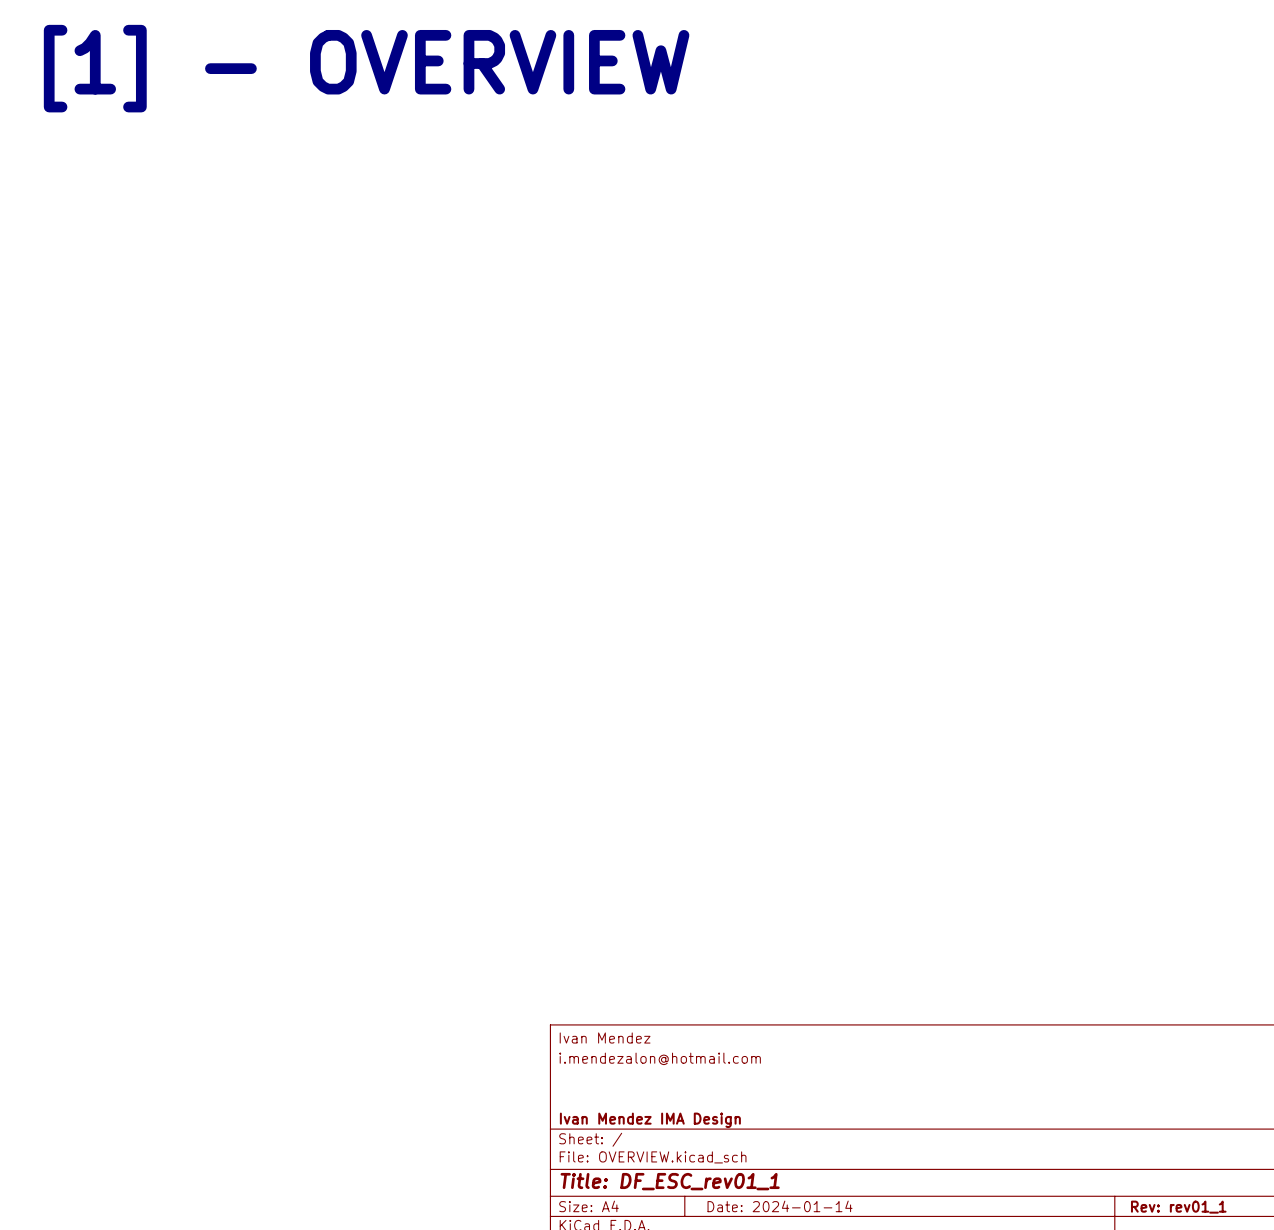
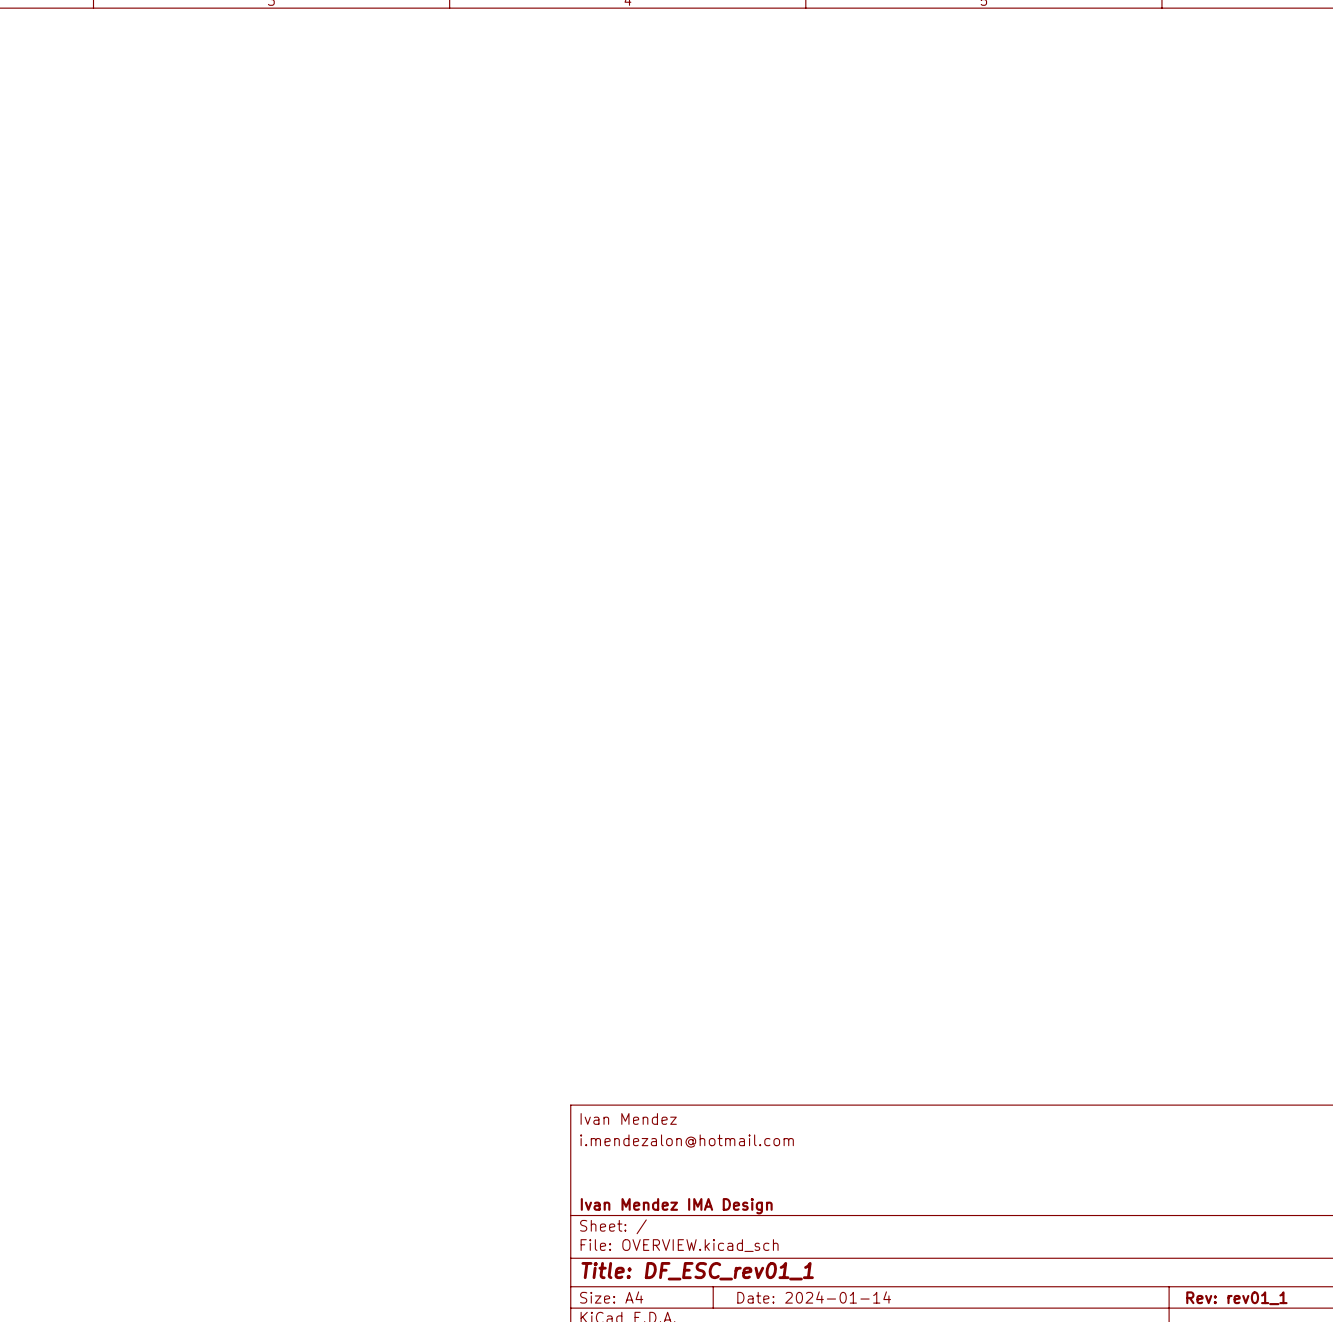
text: [1] - OVERVIEW (366, 68) -> none

